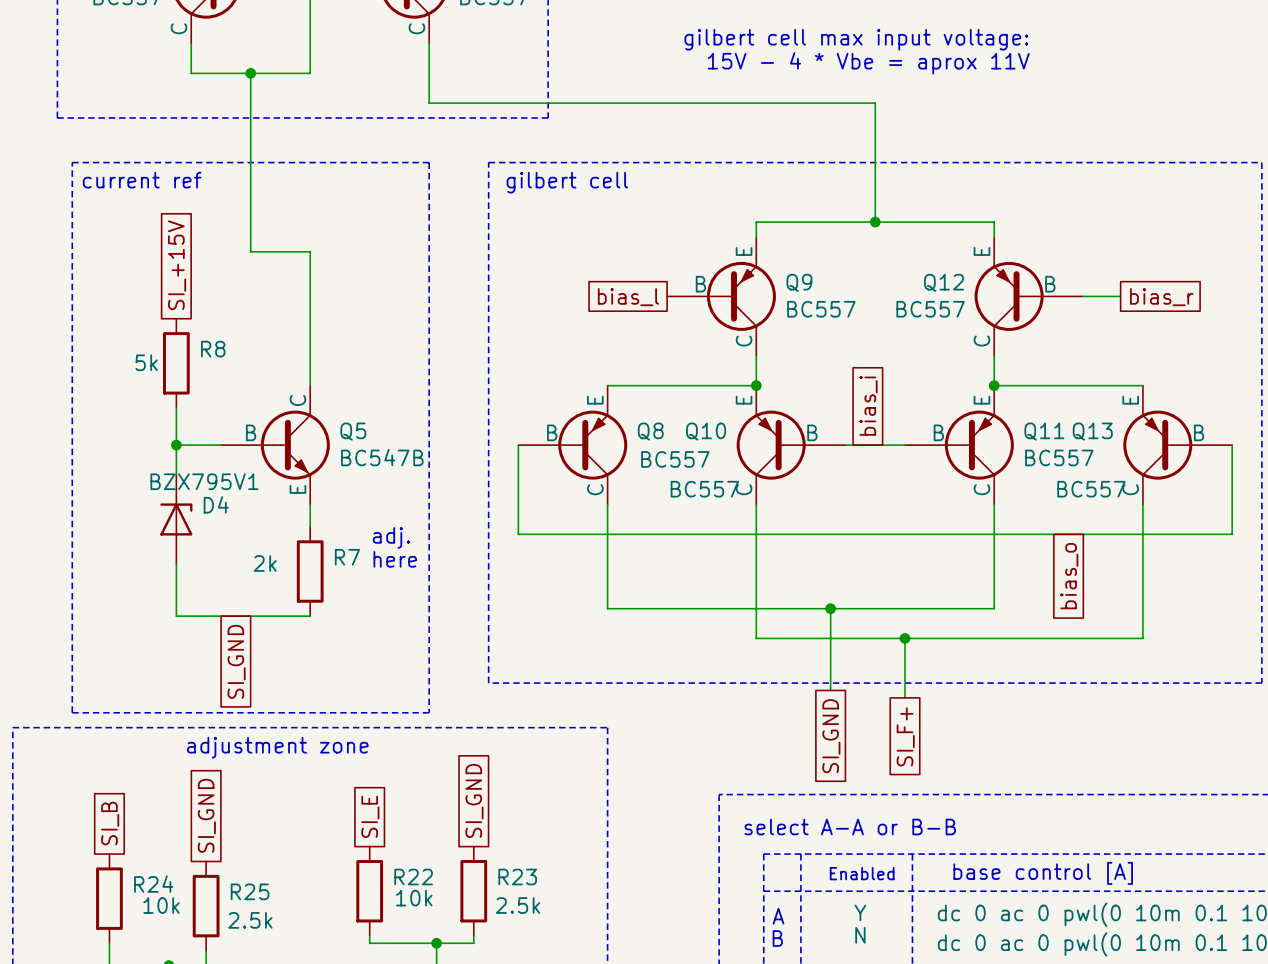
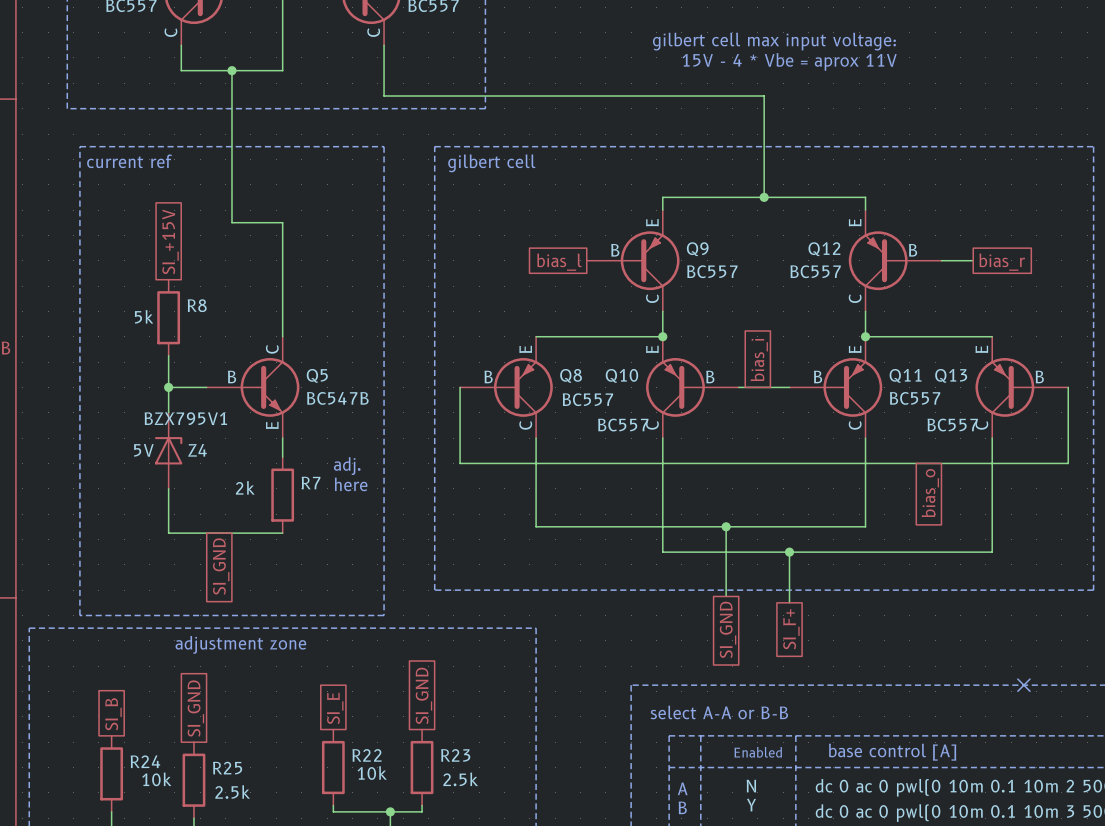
D4 name: D4 (216, 504) -> Z4 (197, 450)
D4 value: none -> 5V (143, 450)
no-connect mark: none -> (1023, 685)
part text: Y (860, 912) -> N (751, 786)
part text: N (860, 935) -> Y (751, 805)

